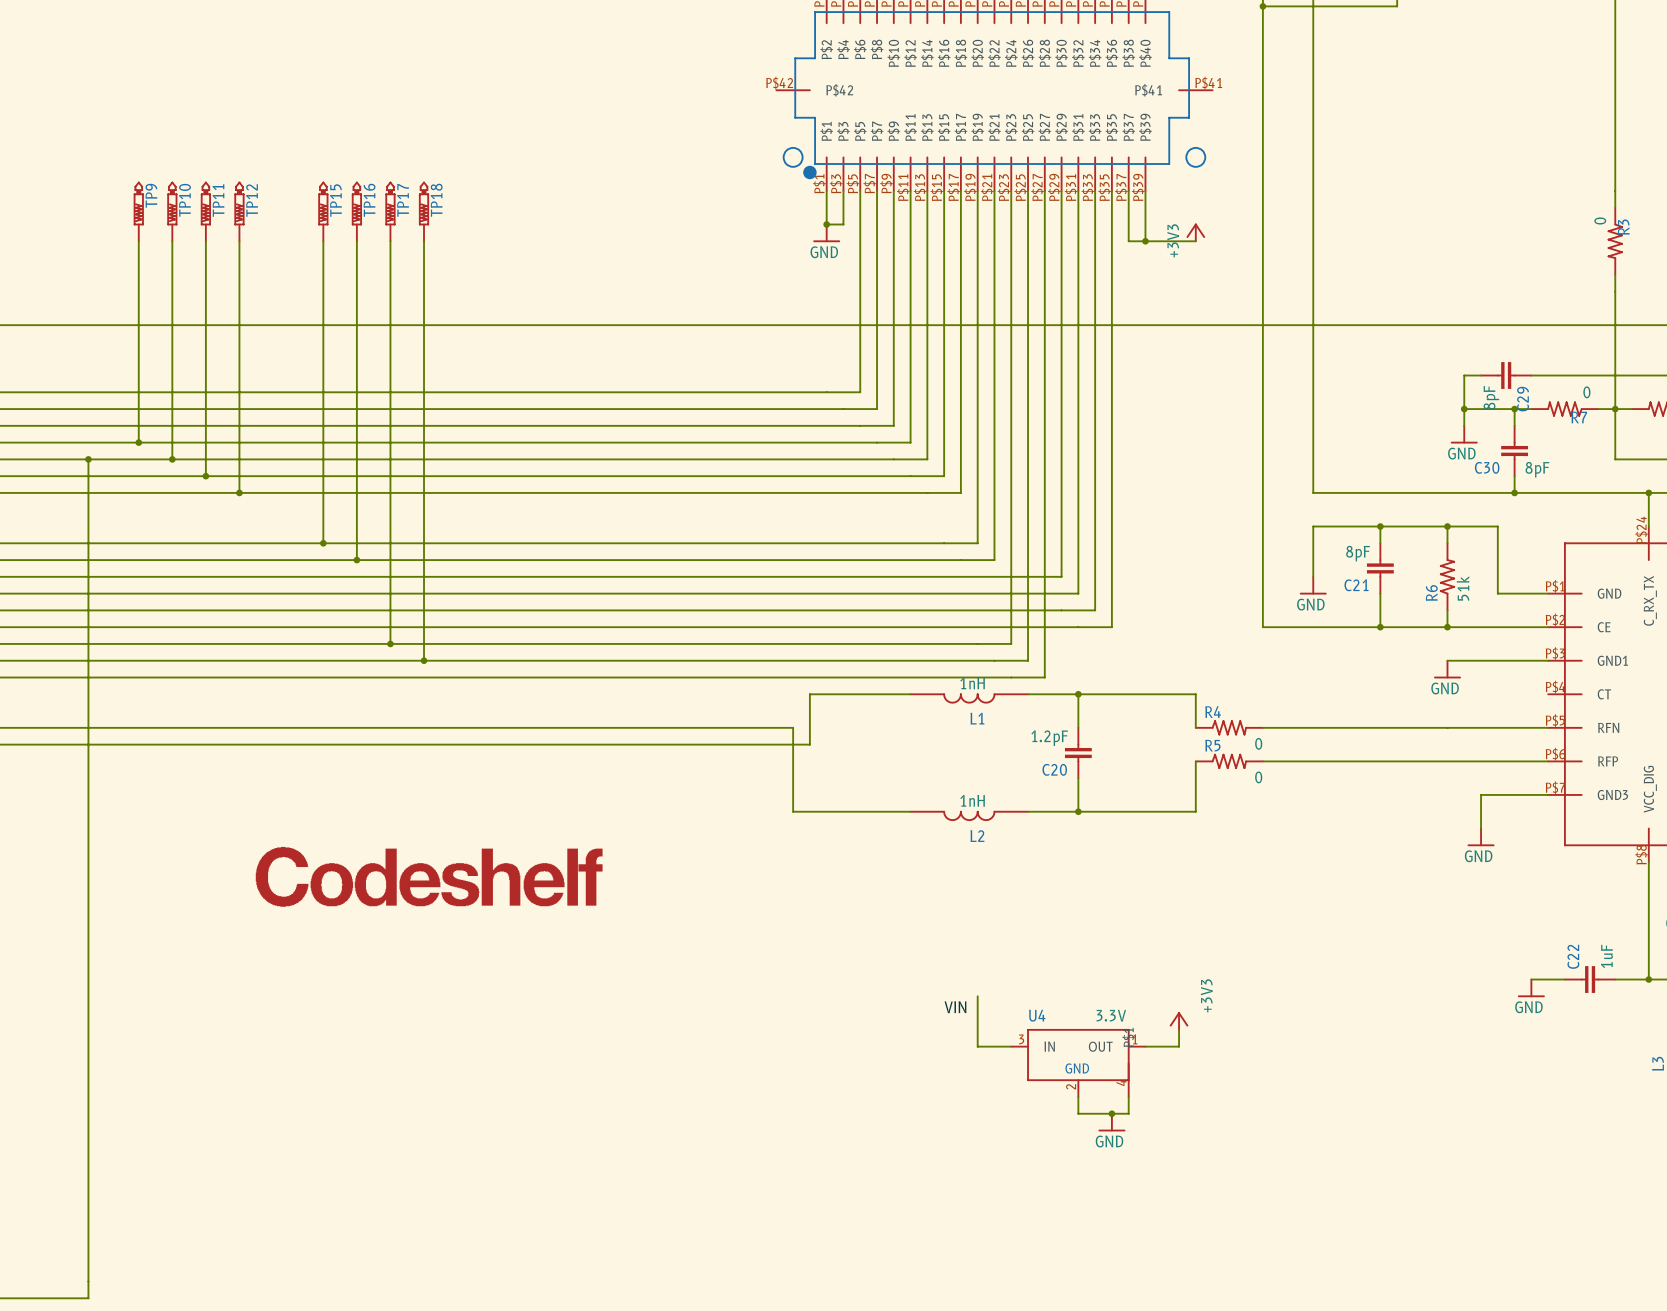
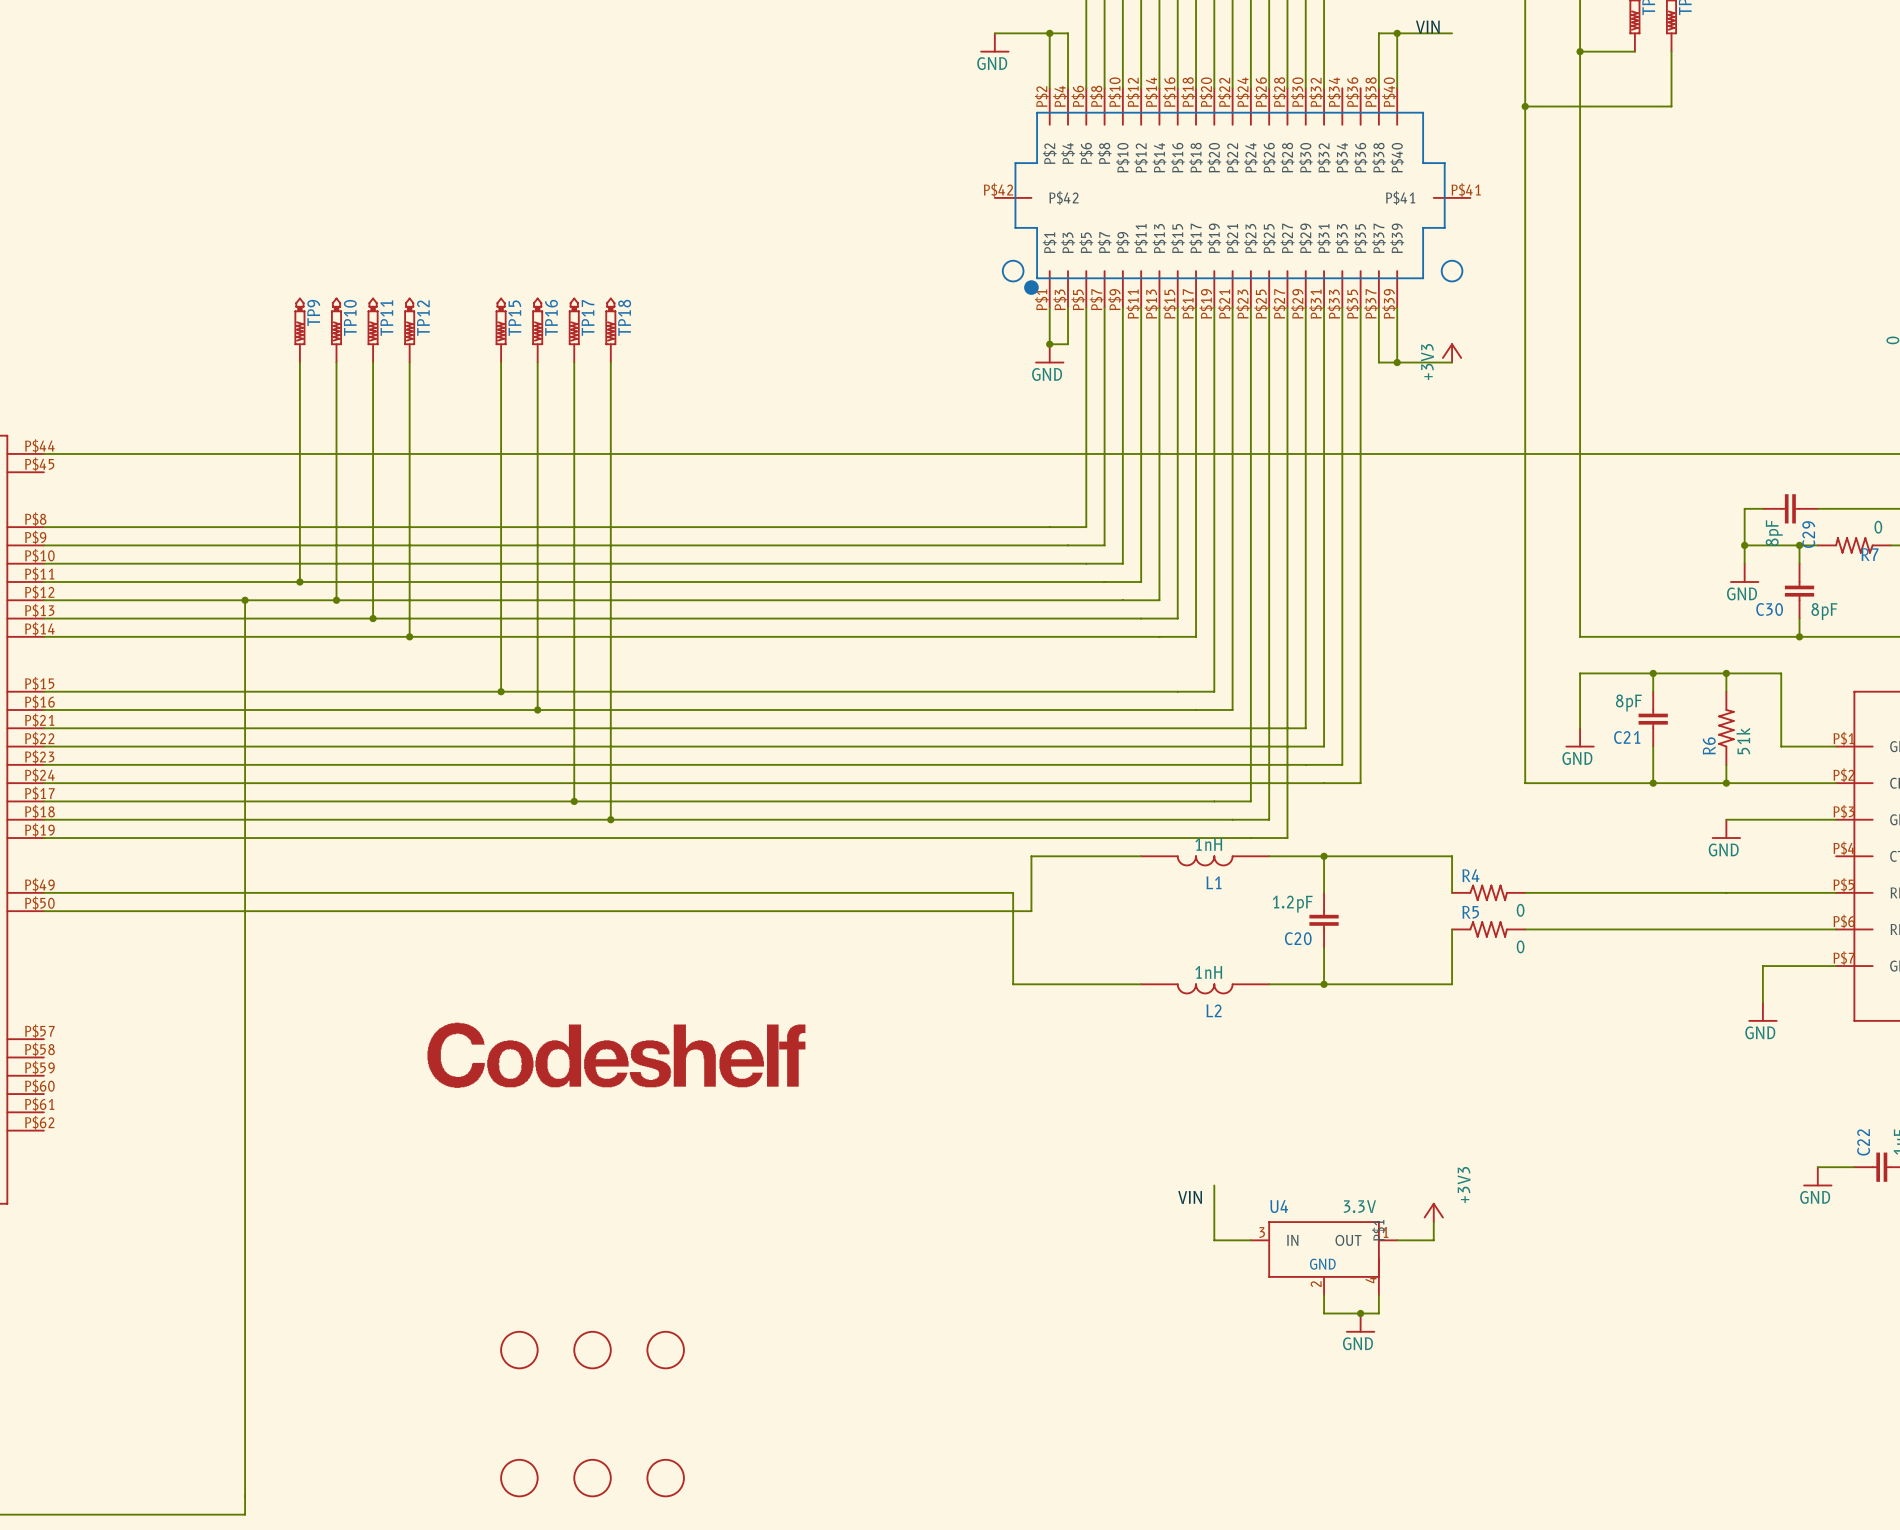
part: none -> (519, 1350)
part: none -> (592, 1350)
part: none -> (665, 1350)
part: none -> (519, 1478)
part: none -> (592, 1478)
part: none -> (665, 1478)

